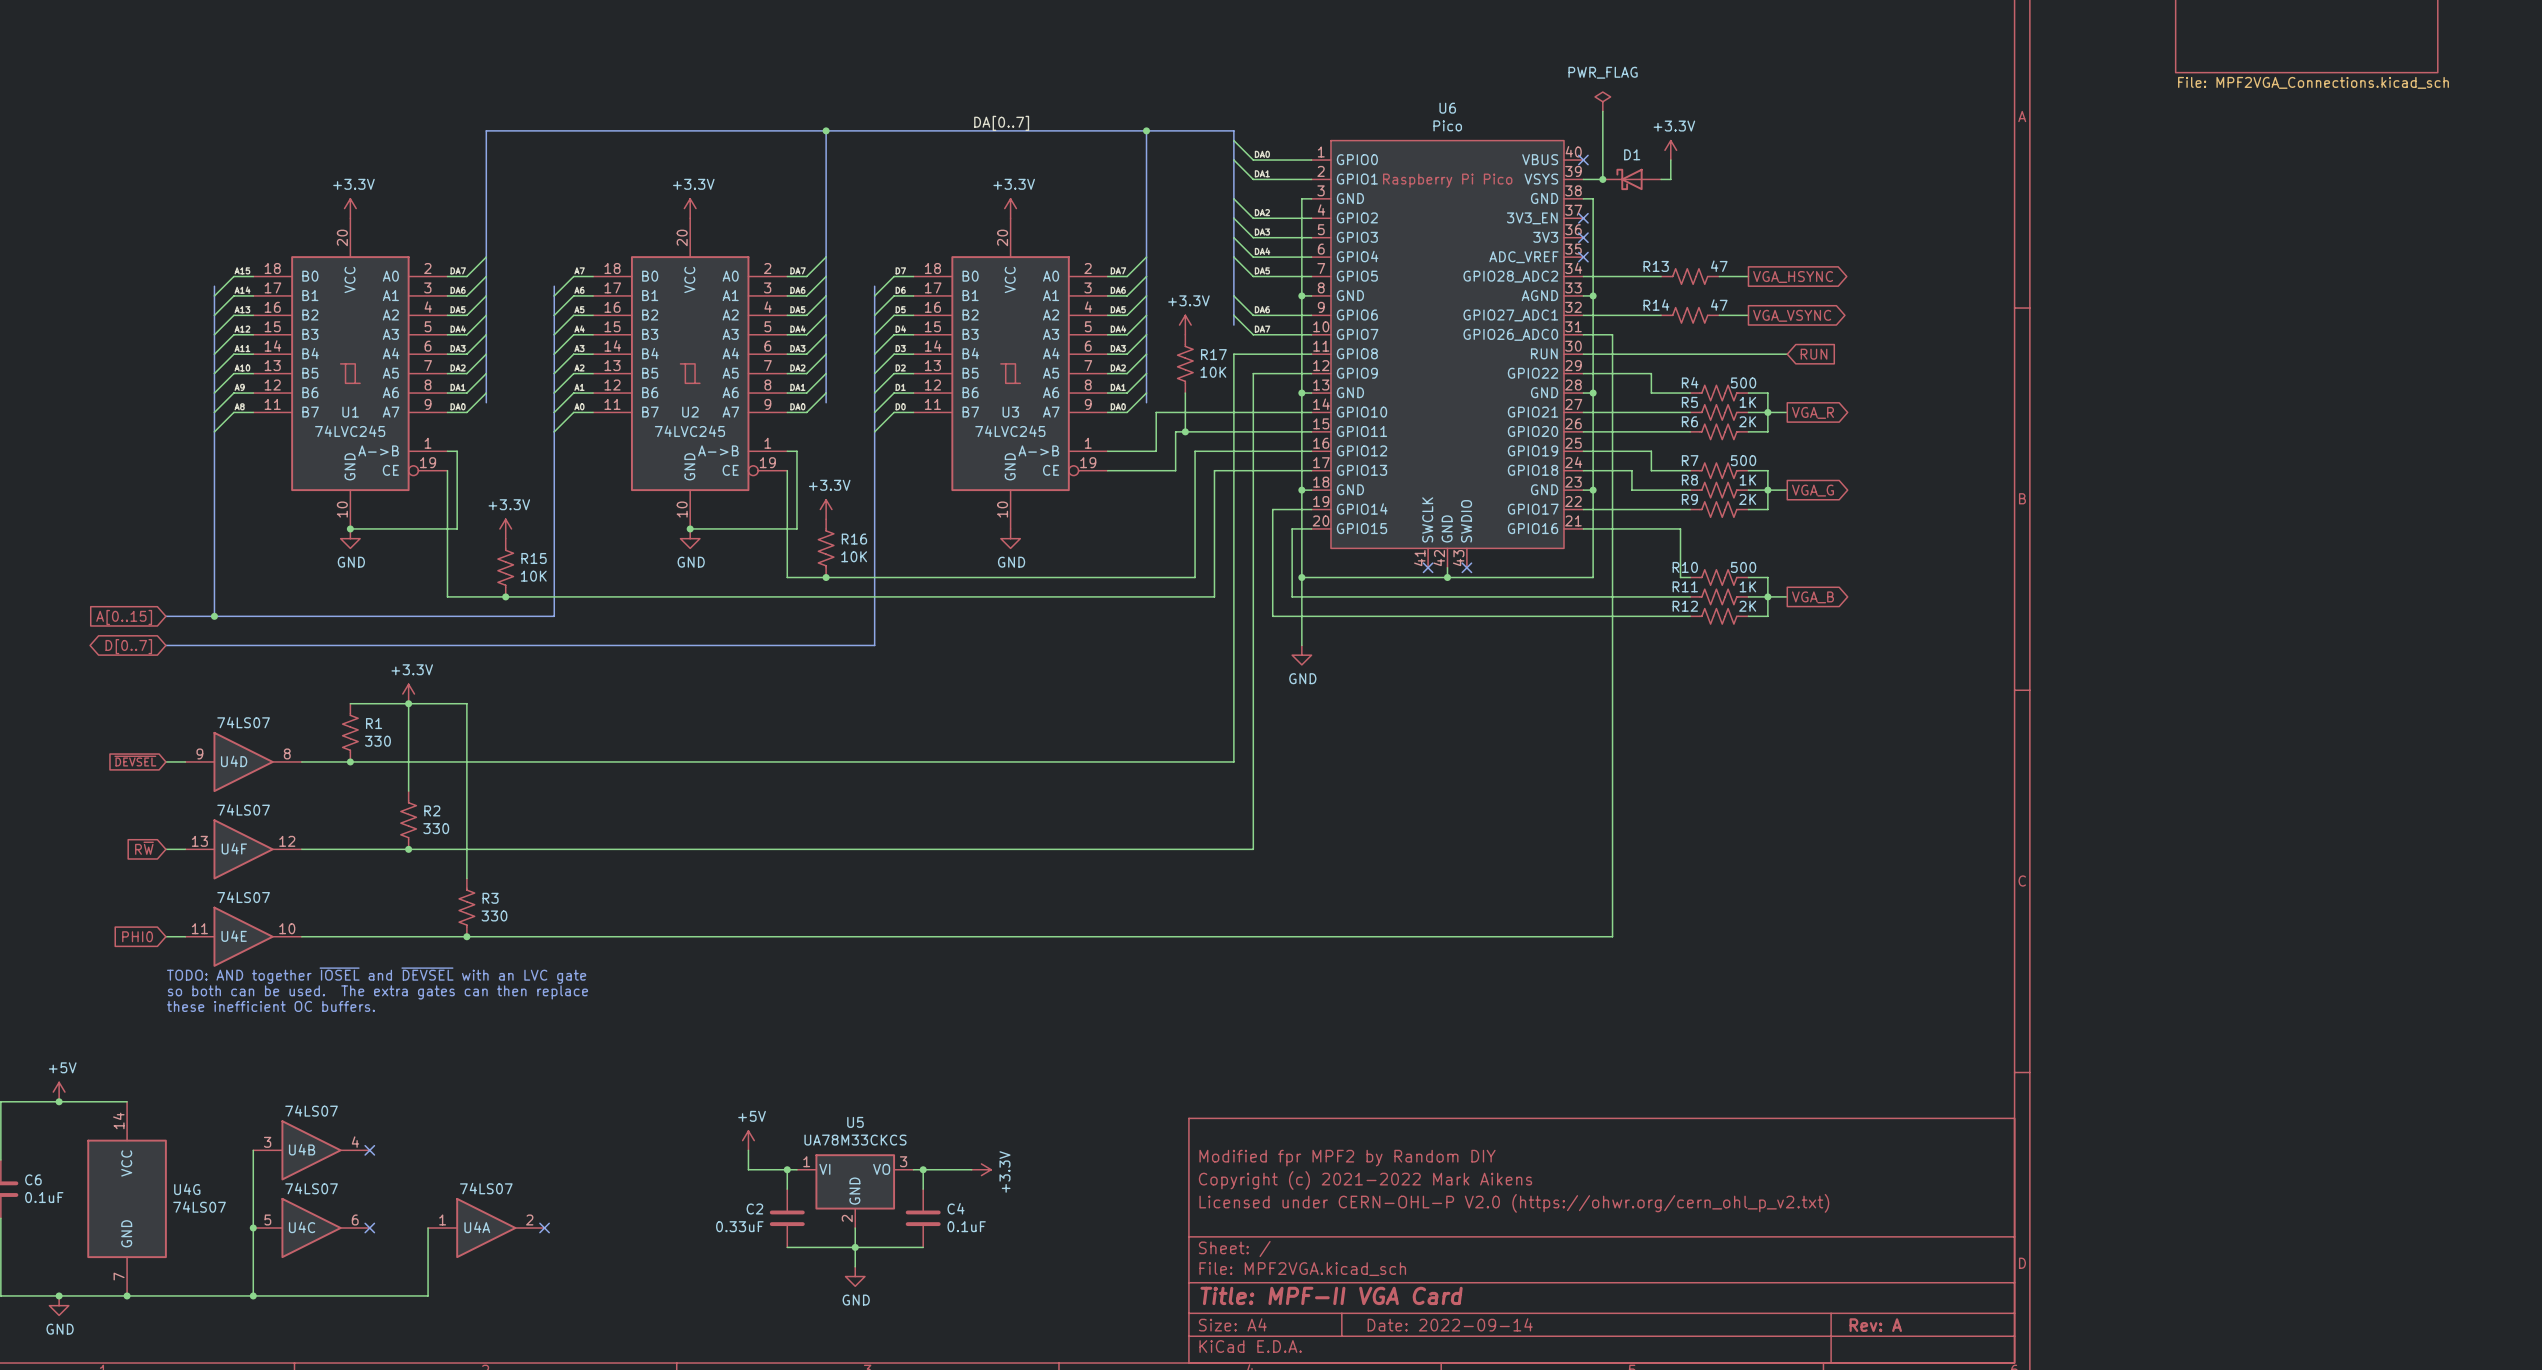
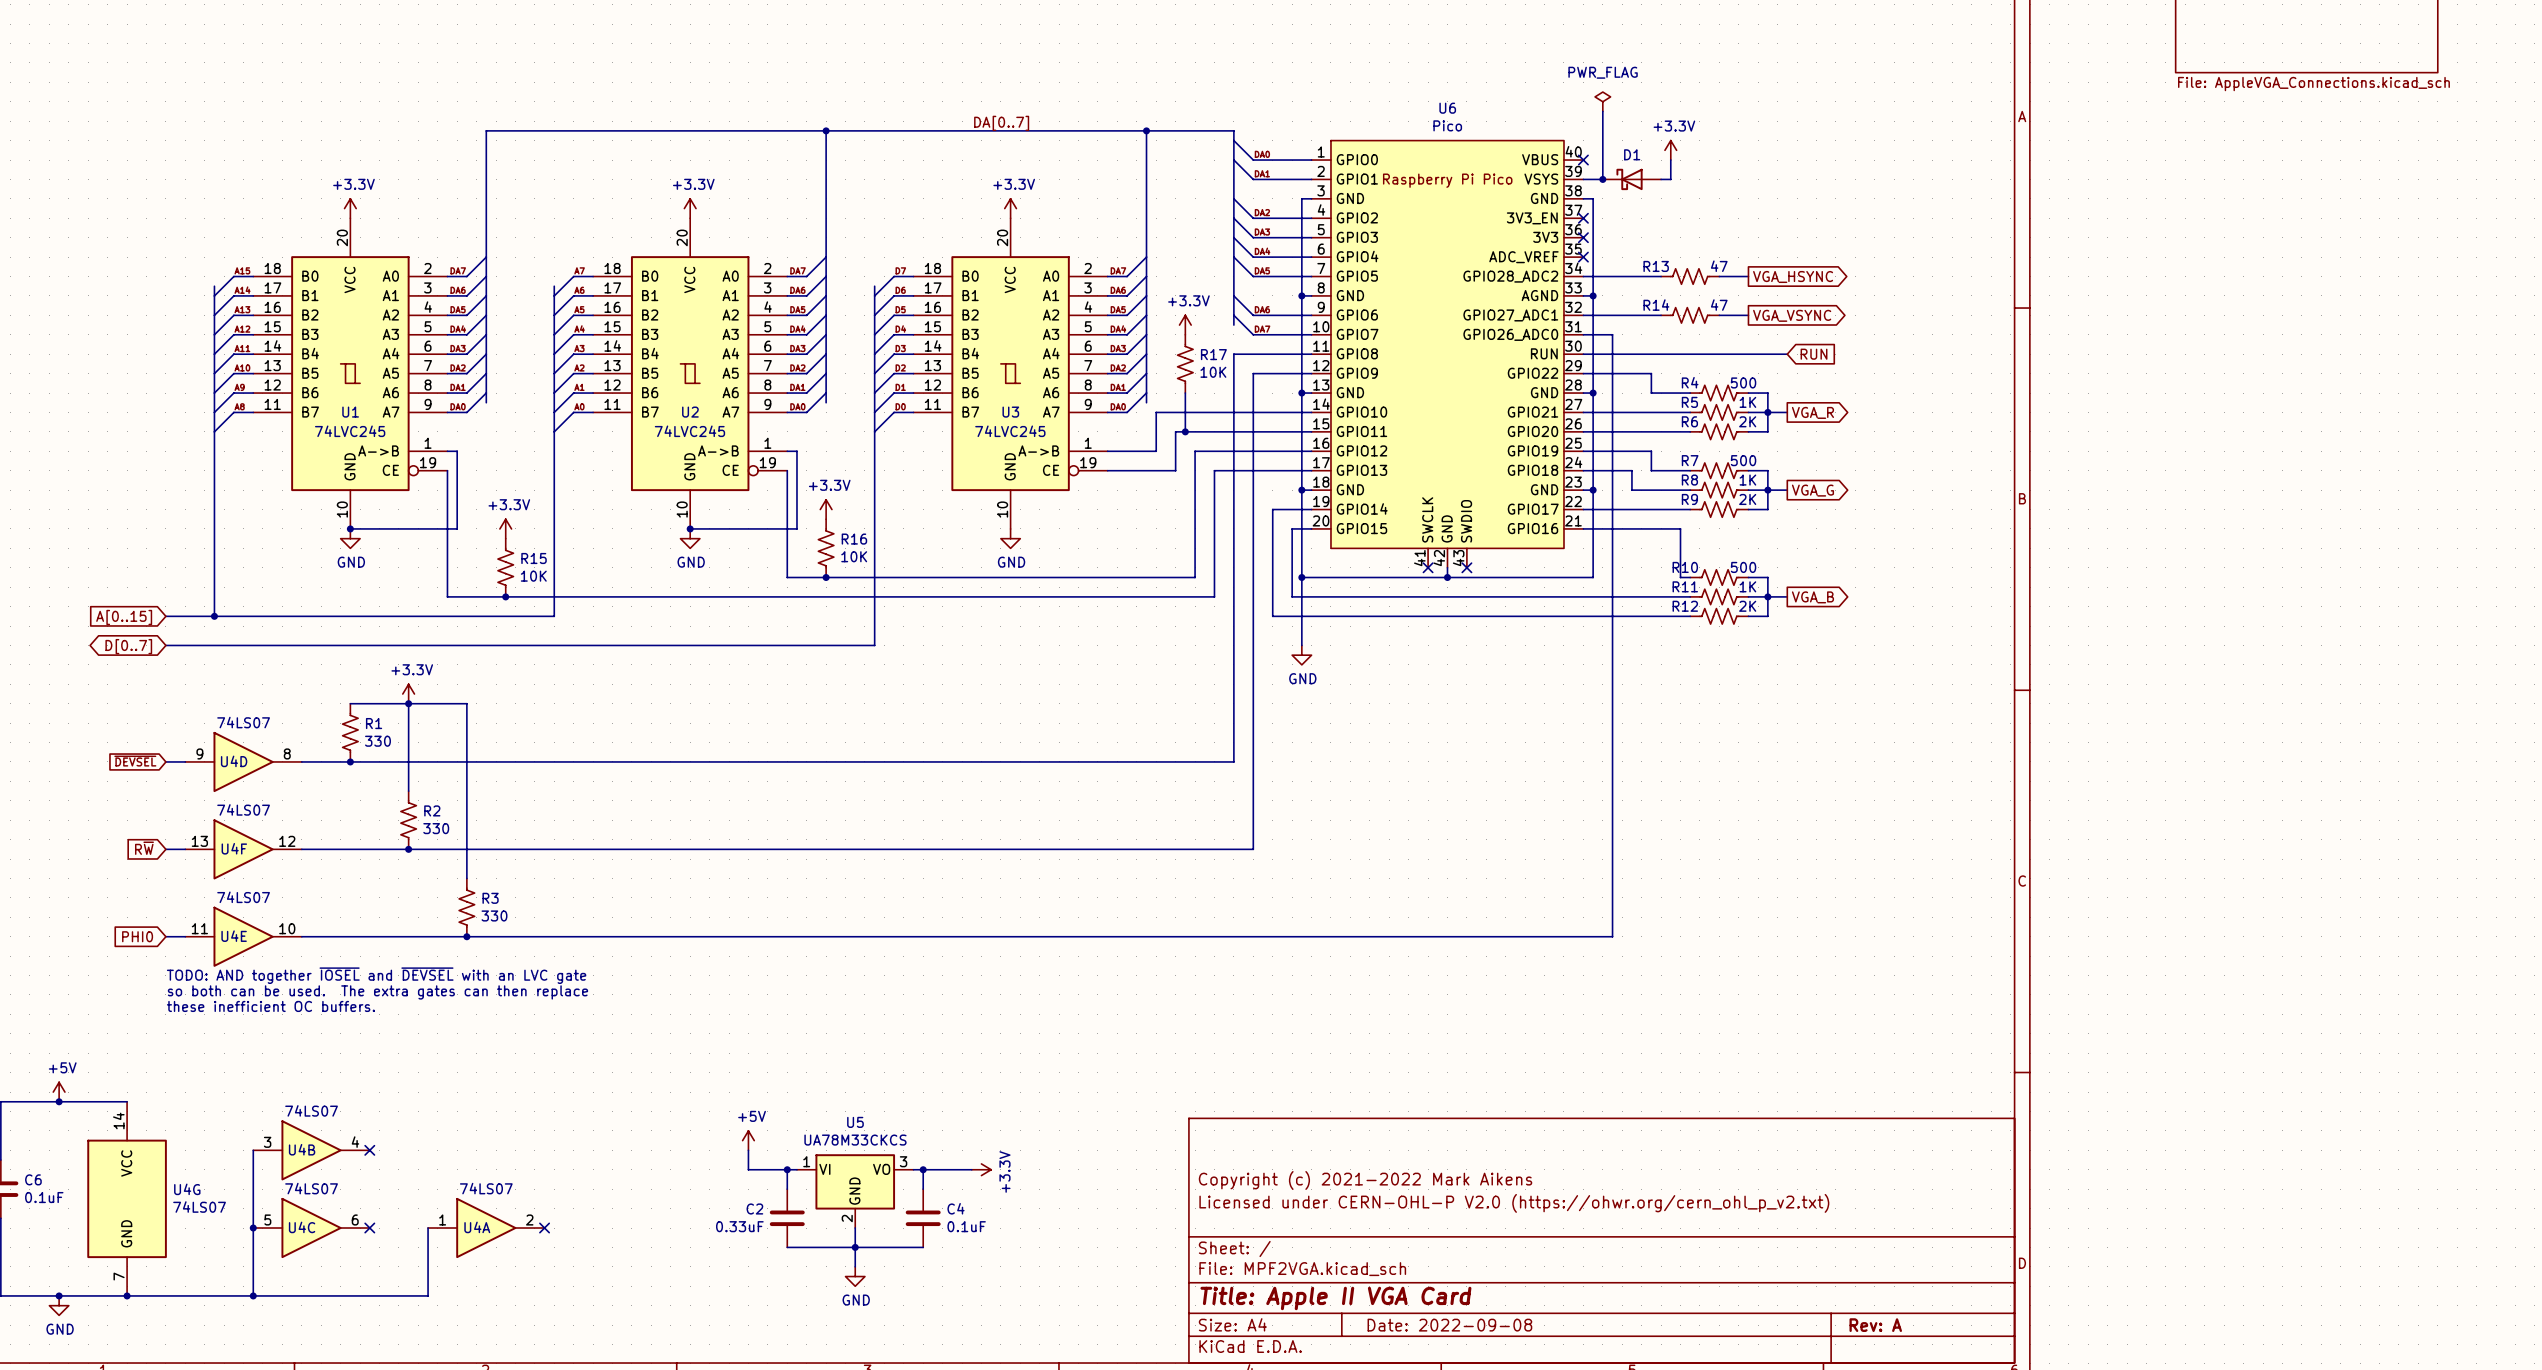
sheet value: File: MPF2VGA_Connections.kicad_sch (2313, 82) -> File: AppleVGA_Connections.kicad_sch (2313, 84)
title block: Modified fpr MPF2 by Random DIY (1347, 1158) -> none
title block: Title: MPF-II VGA Card (1331, 1295) -> Title: Apple II VGA Card (1335, 1298)
title block: Date: 2022-09-14 (1450, 1324) -> Date: 2022-09-08 (1449, 1325)

